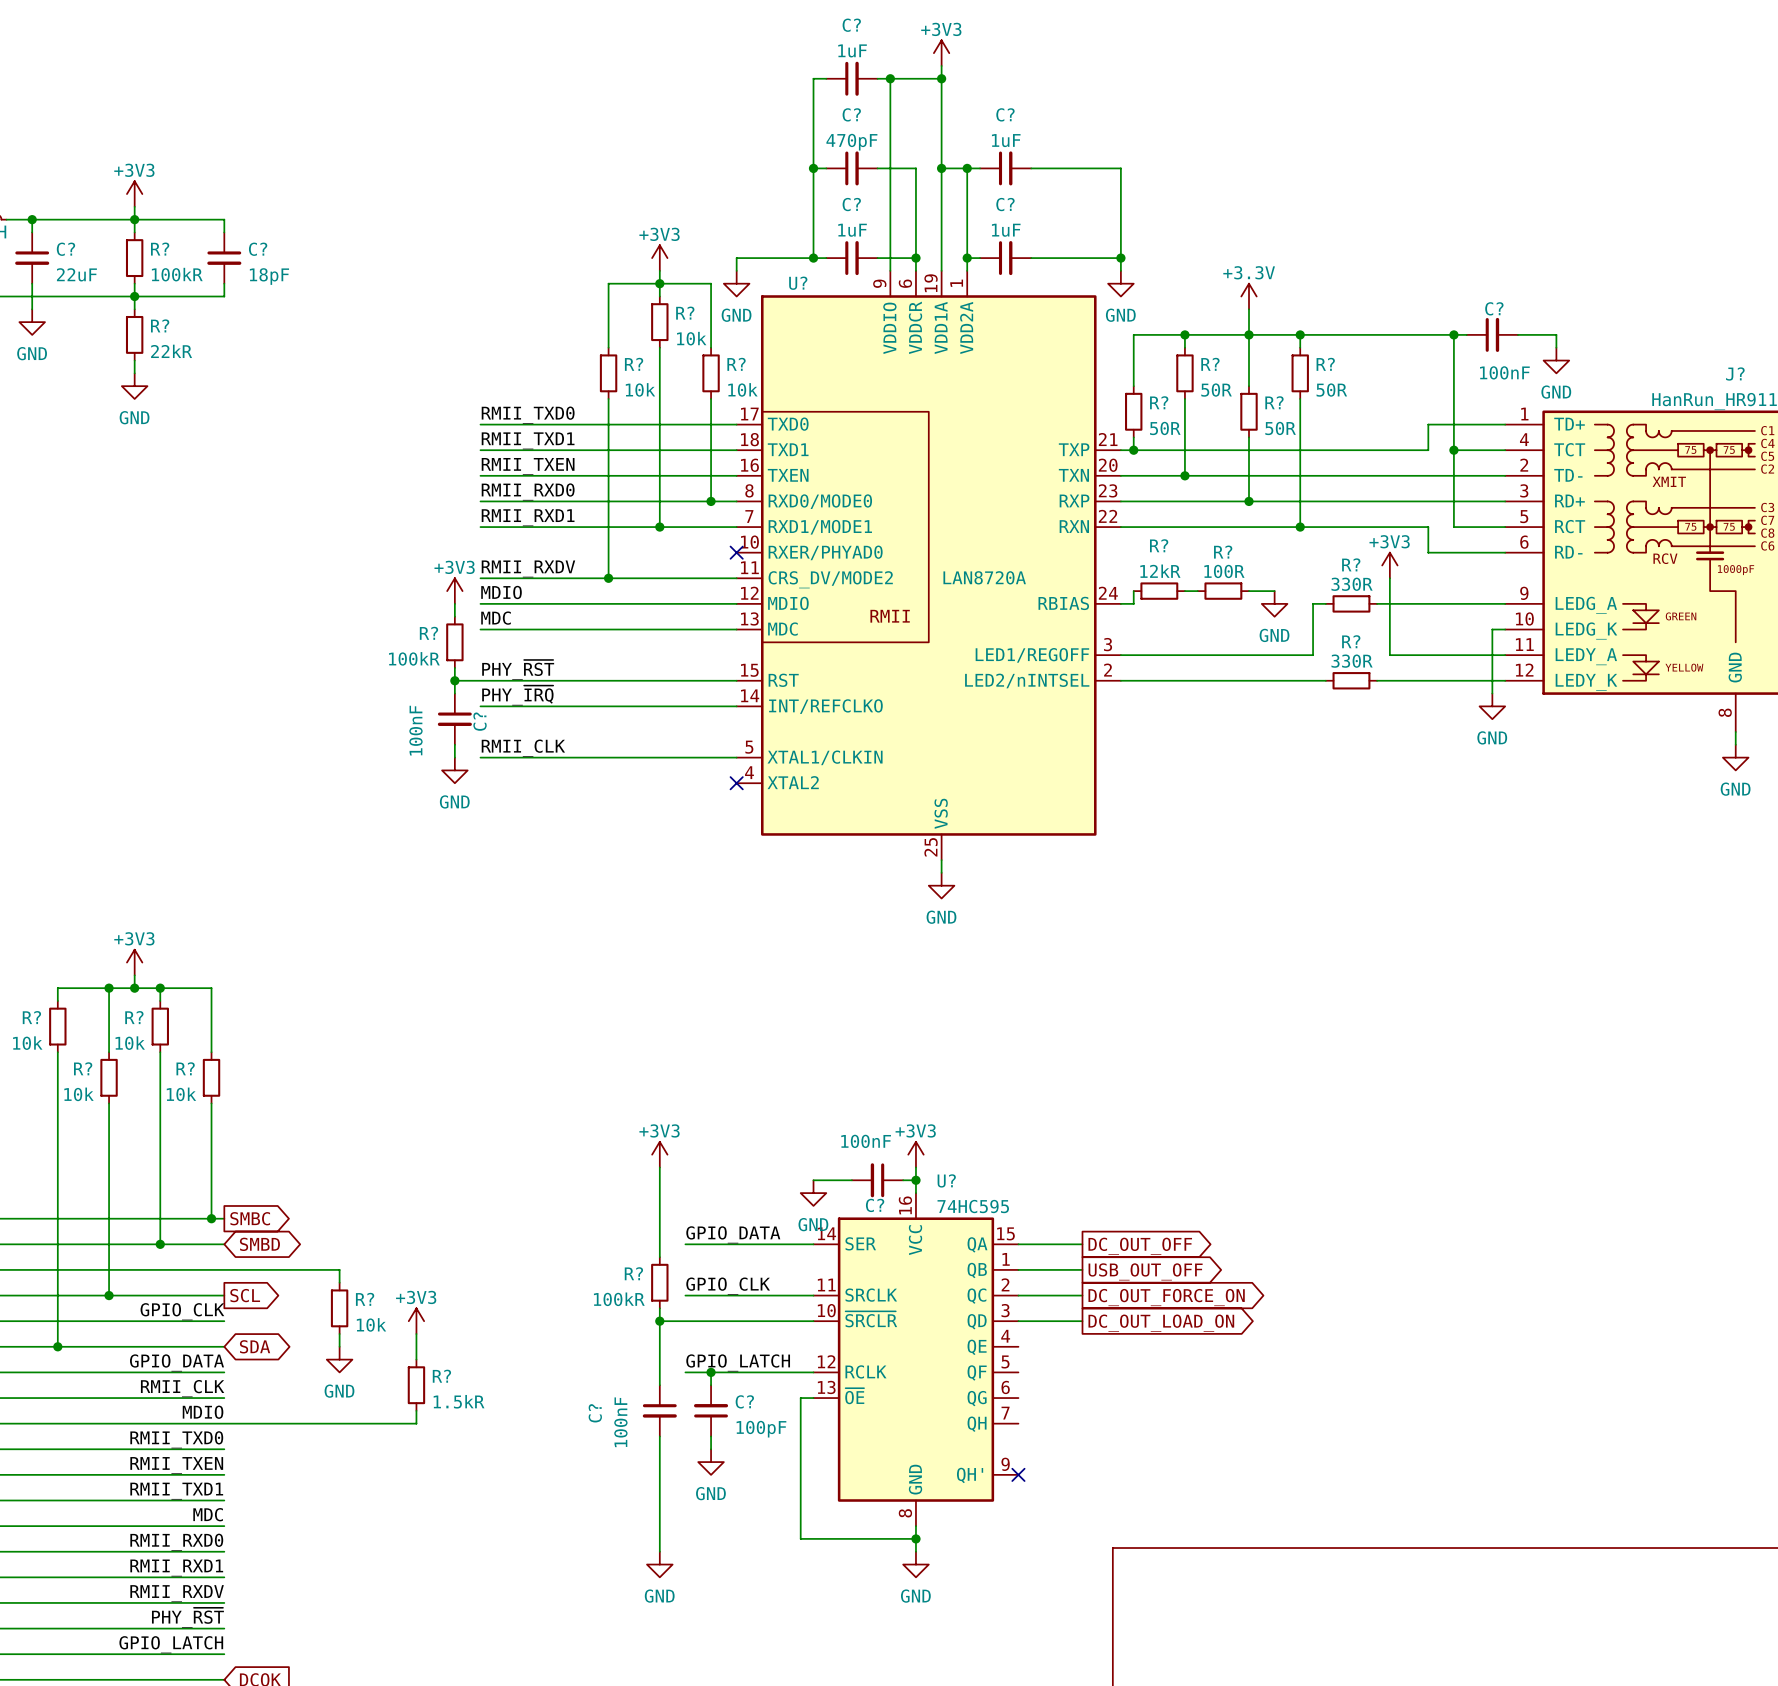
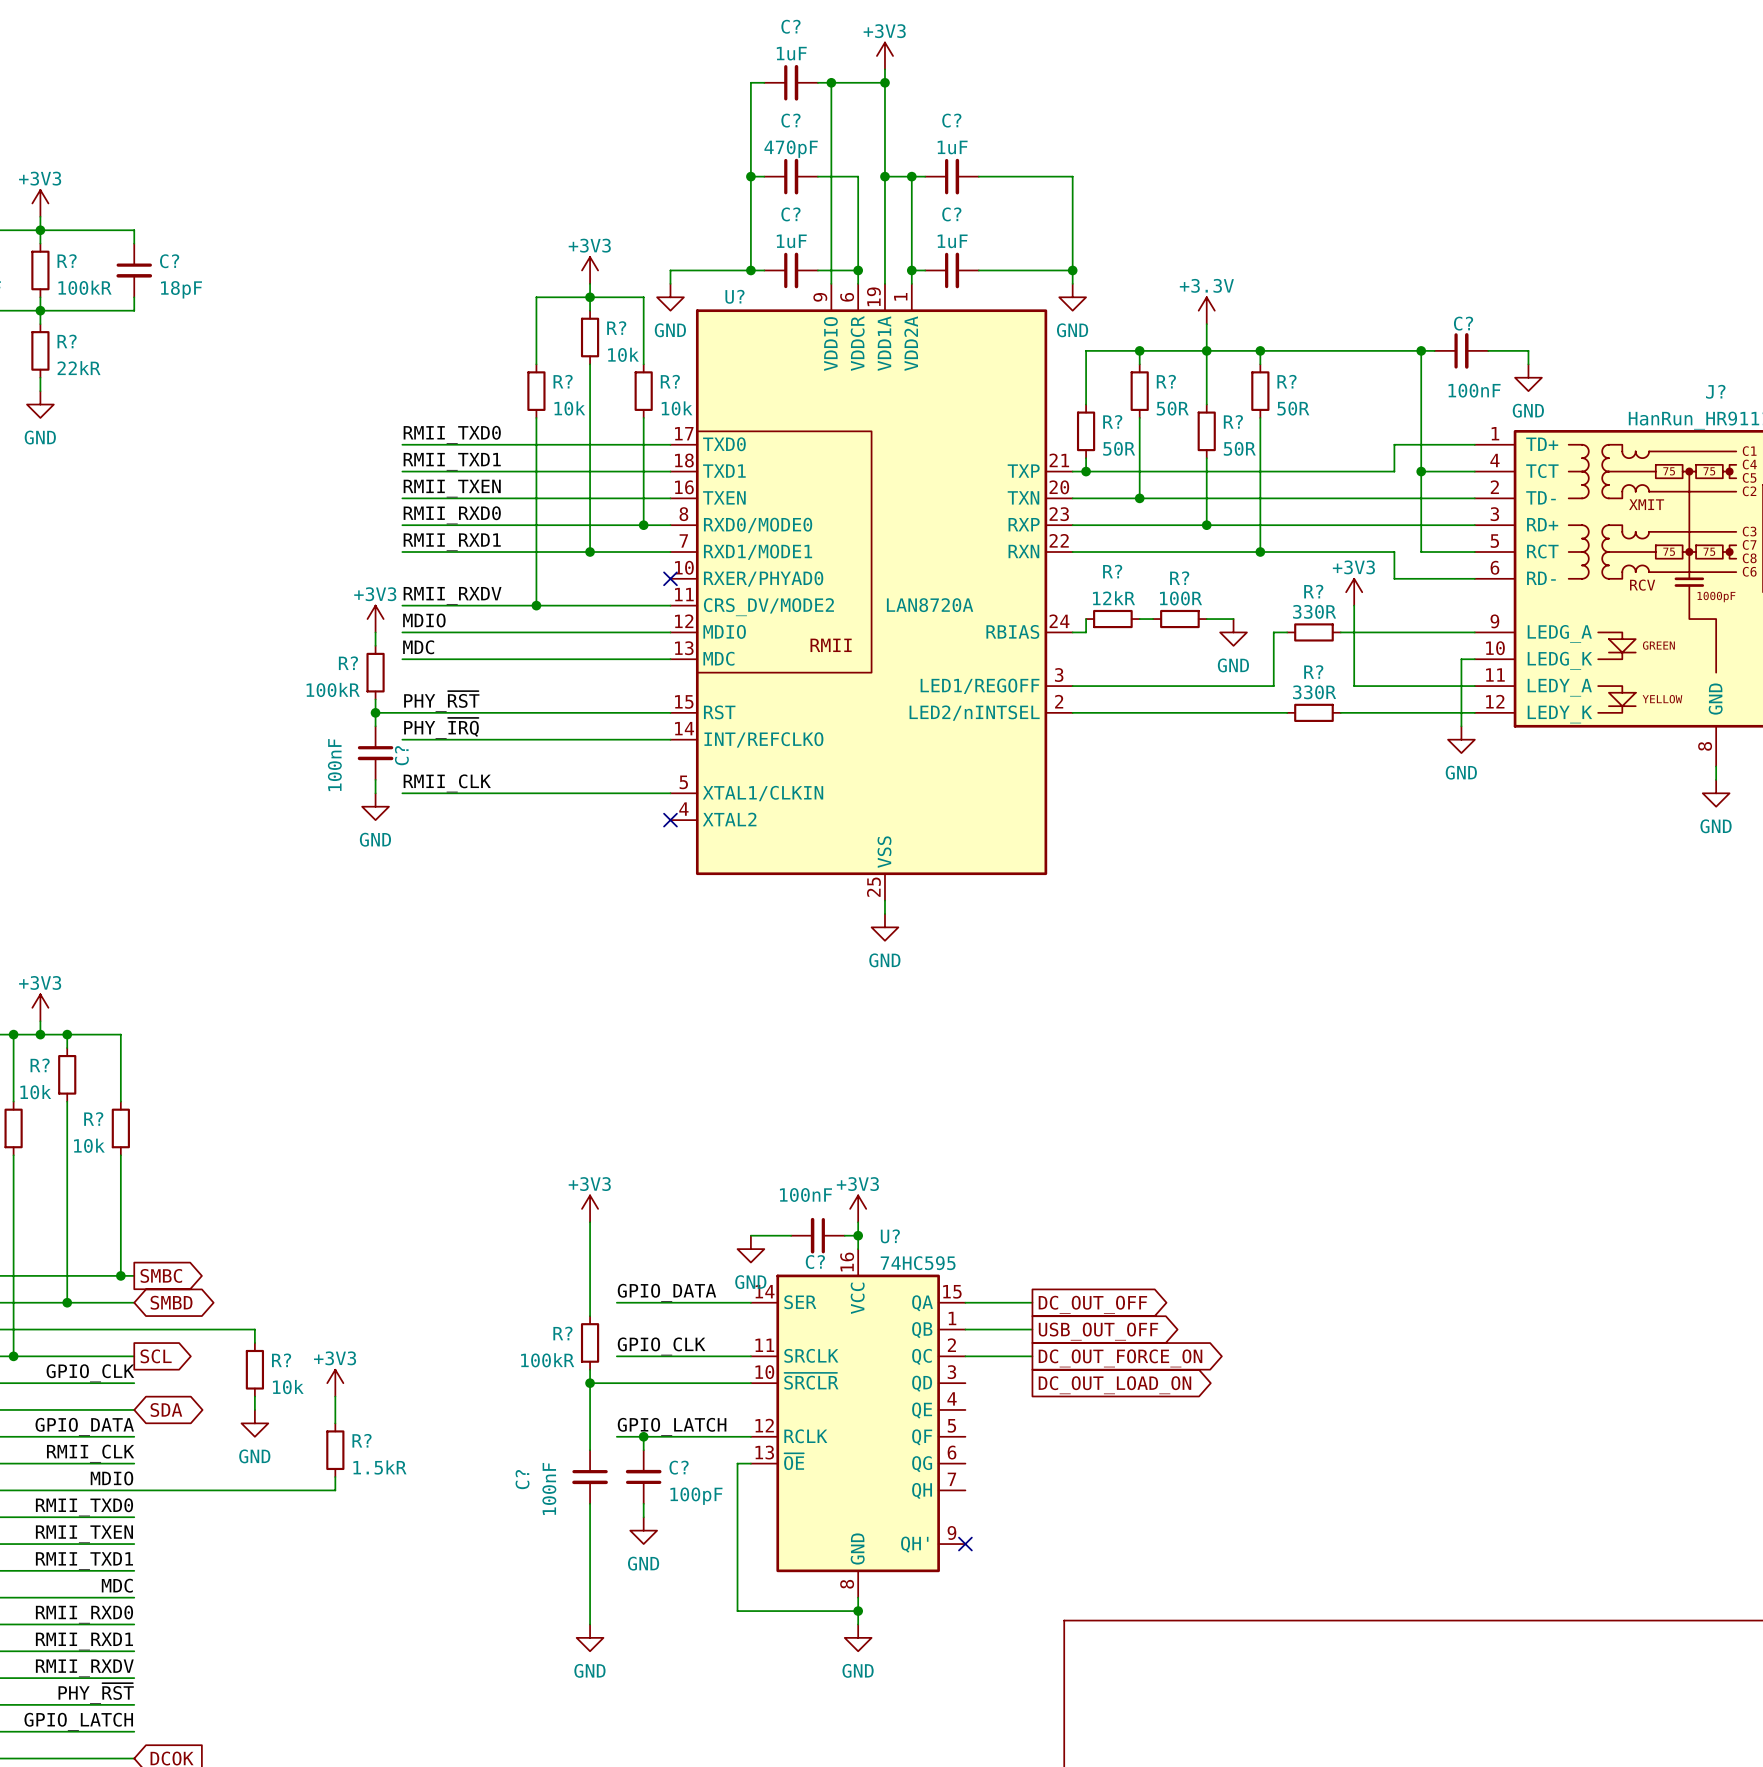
wire: (1018, 1321) (1082, 1321) -> none

